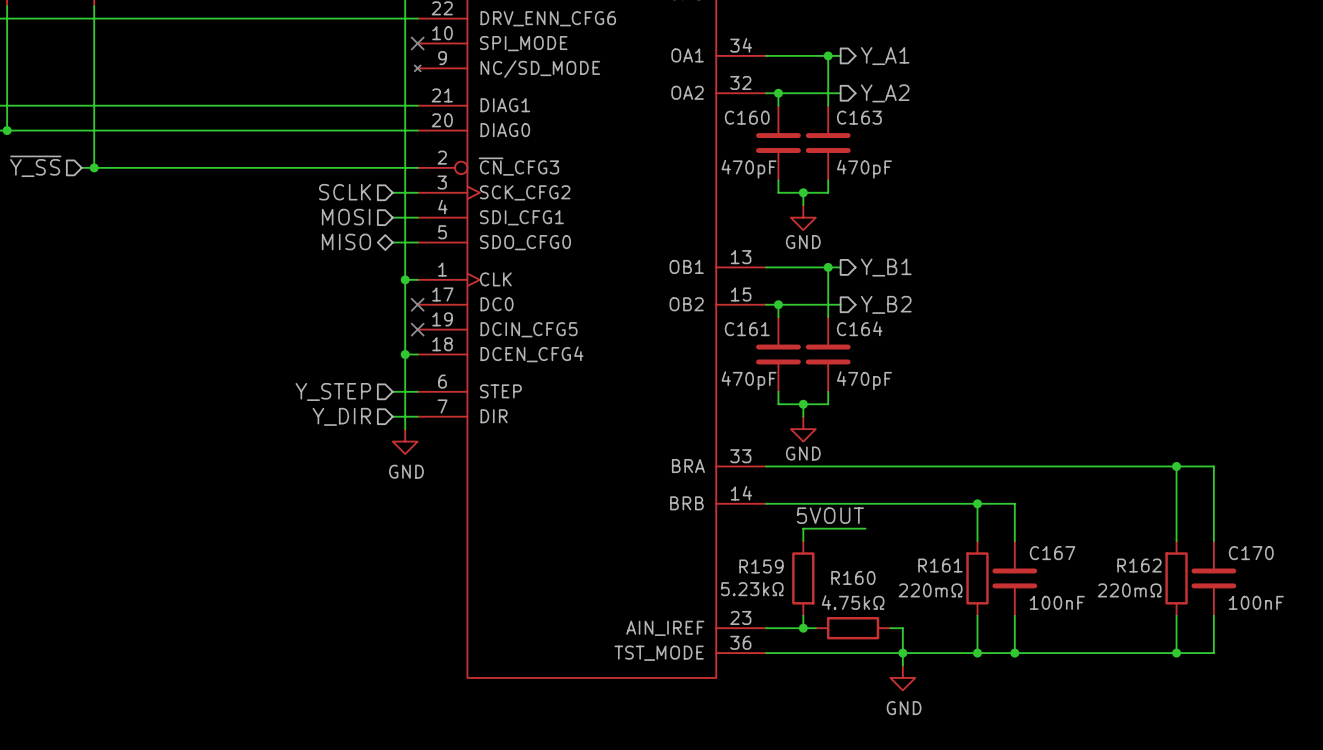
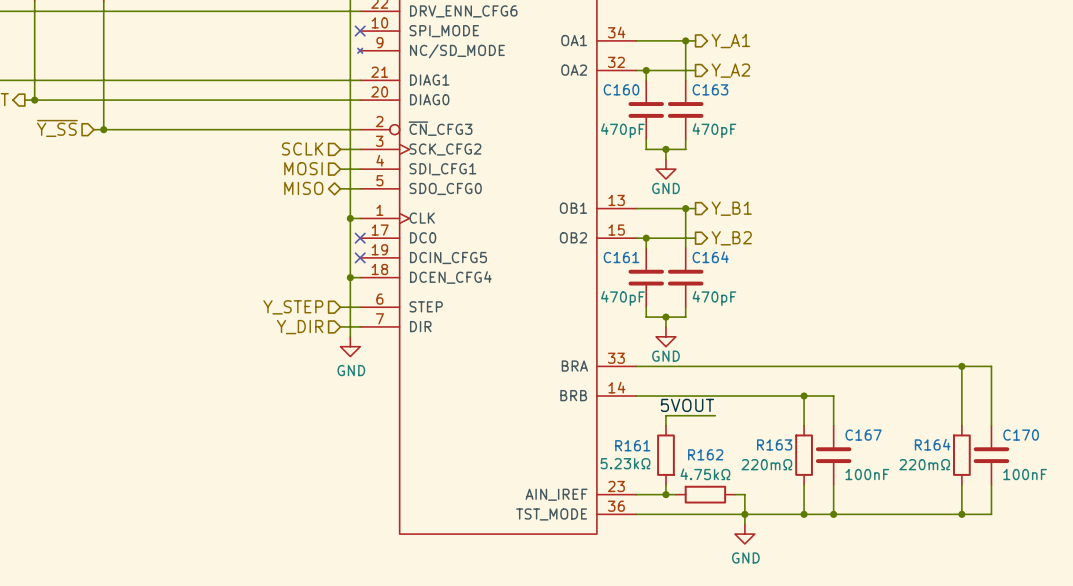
R161 name: R161 (940, 565) -> R163 (774, 444)
R162 name: R162 (1139, 565) -> R164 (932, 444)
R159 name: R159 (761, 566) -> R161 (632, 445)
R160 name: R160 (853, 577) -> R162 (705, 454)

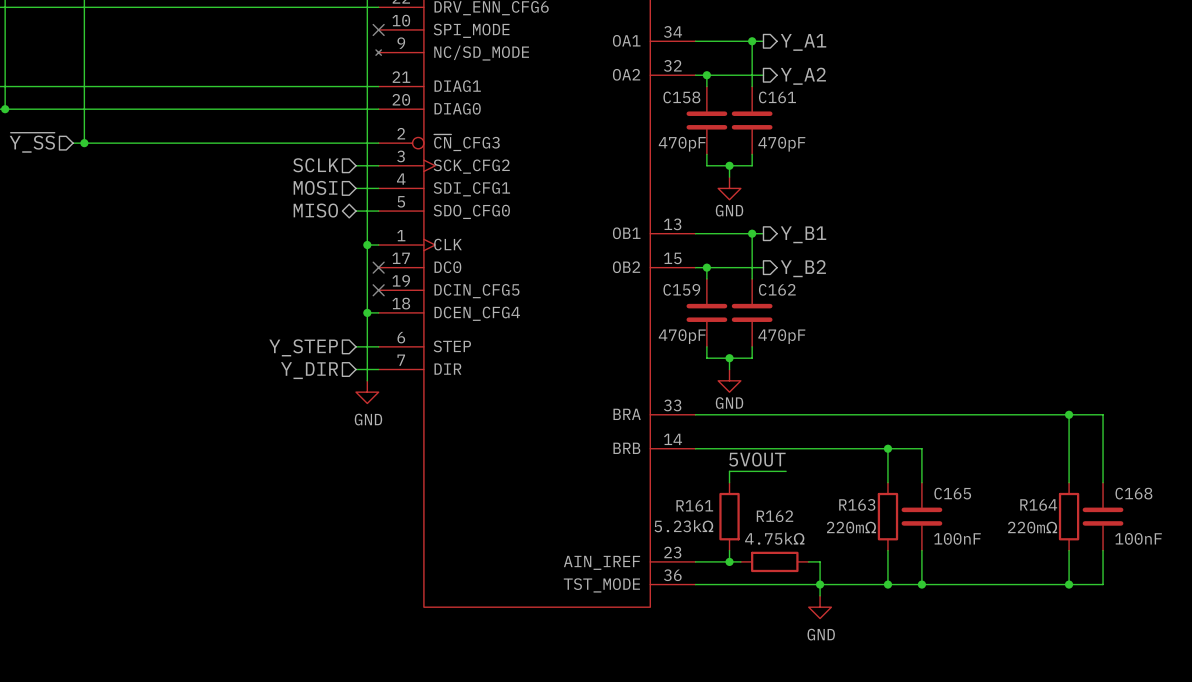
C160 name: C160 (621, 89) -> C158 (681, 97)
C163 name: C163 (710, 89) -> C161 (777, 97)
C161 name: C161 (621, 257) -> C159 (681, 289)
C164 name: C164 (710, 257) -> C162 (777, 289)
C167 name: C167 (863, 435) -> C165 (952, 493)
C170 name: C170 (1021, 435) -> C168 (1133, 493)

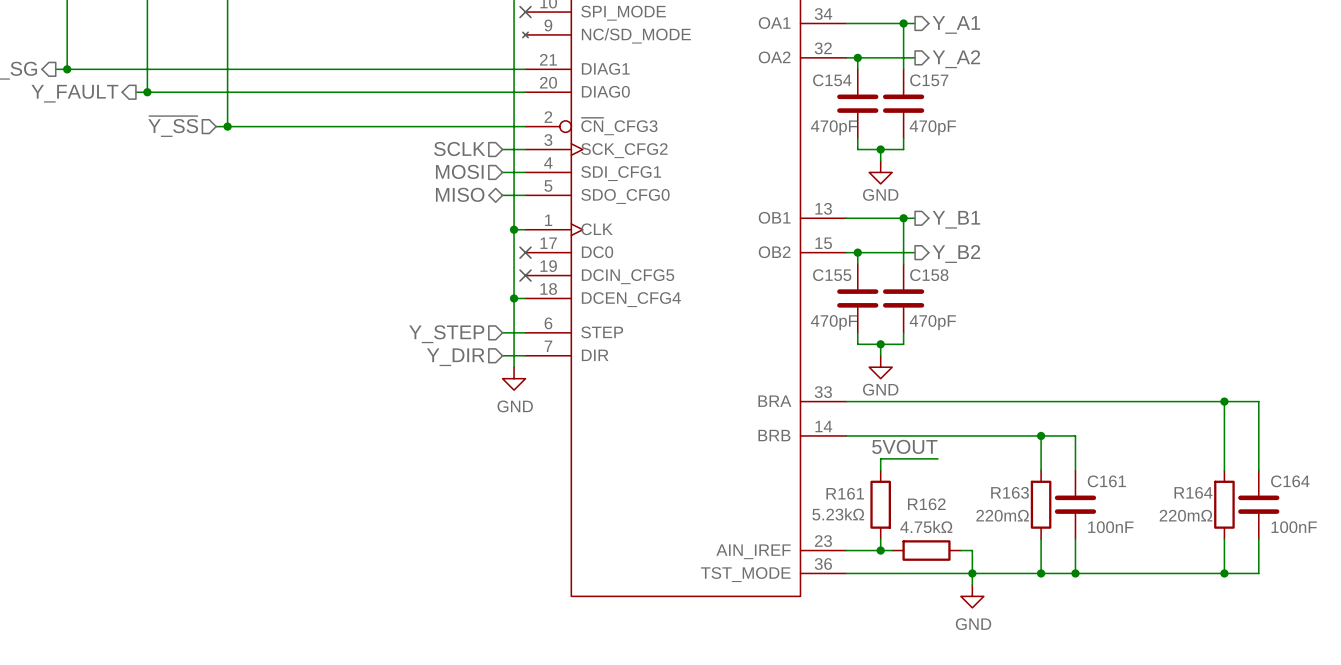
C158 name: C158 (681, 97) -> C154 (832, 80)
C161 name: C161 (777, 97) -> C157 (929, 80)
C159 name: C159 (681, 289) -> C155 (832, 275)
C162 name: C162 (777, 289) -> C158 (929, 275)
C165 name: C165 (952, 493) -> C161 (1106, 481)
C168 name: C168 (1133, 493) -> C164 (1290, 481)

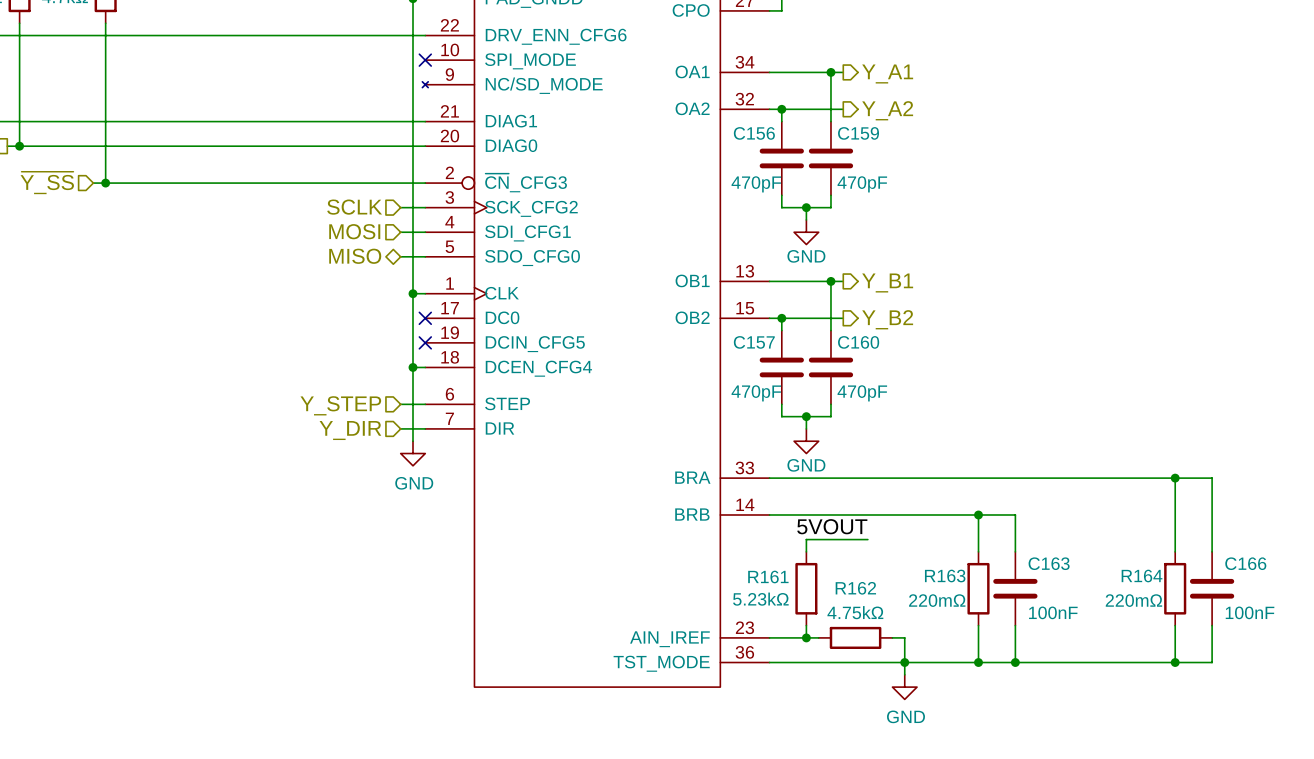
C154 name: C154 (832, 80) -> C156 (754, 133)
C157 name: C157 (929, 80) -> C159 (858, 133)
C155 name: C155 (832, 275) -> C157 (754, 342)
C158 name: C158 (929, 275) -> C160 (858, 342)
C161 name: C161 (1106, 481) -> C163 (1049, 563)
C164 name: C164 (1290, 481) -> C166 (1245, 563)

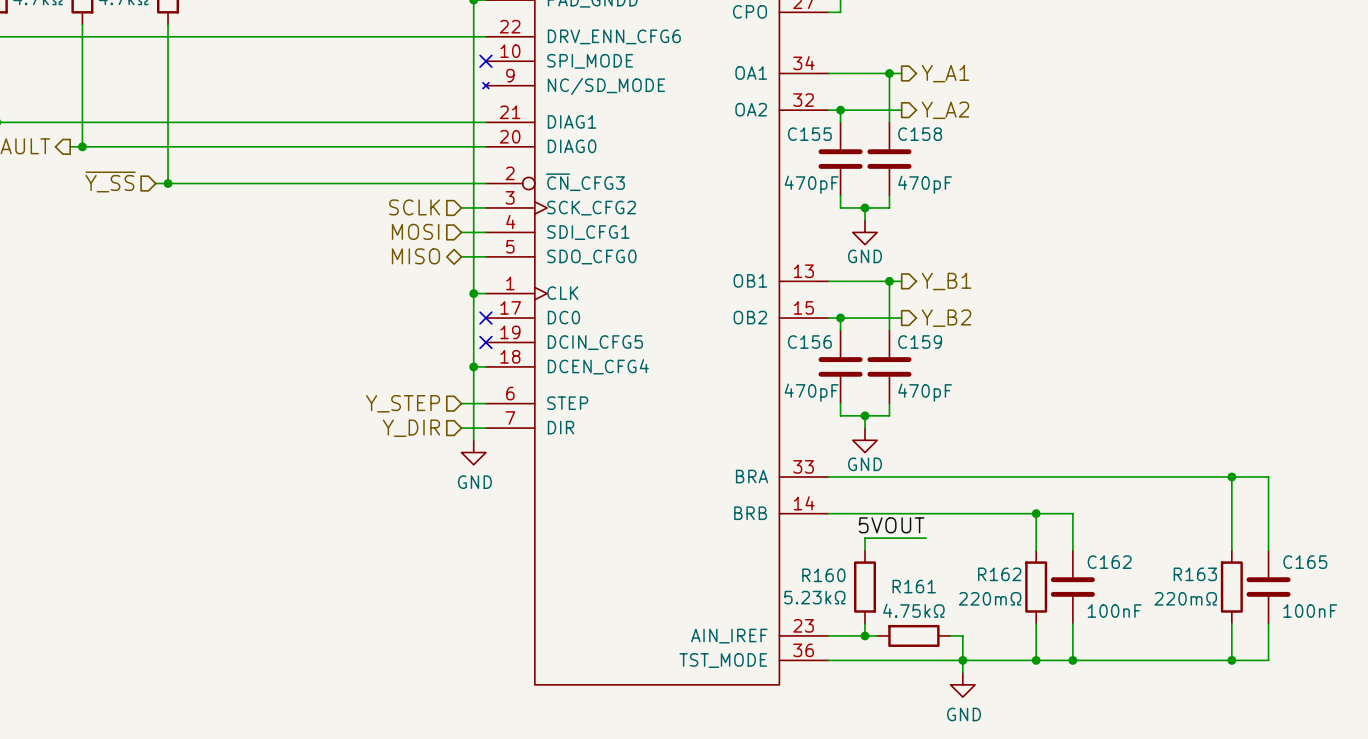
C156 name: C156 (754, 133) -> C155 (809, 134)
C159 name: C159 (858, 133) -> C158 (920, 134)
C157 name: C157 (754, 342) -> C156 (809, 342)
C160 name: C160 (858, 342) -> C159 (920, 342)
C163 name: C163 (1049, 563) -> C162 (1109, 562)
C166 name: C166 (1245, 563) -> C165 (1305, 562)
R161 name: R161 (768, 576) -> R160 (823, 575)
R163 name: R163 (945, 576) -> R162 (999, 574)
R164 name: R164 (1142, 576) -> R163 (1195, 574)
R162 name: R162 (855, 588) -> R161 (914, 586)

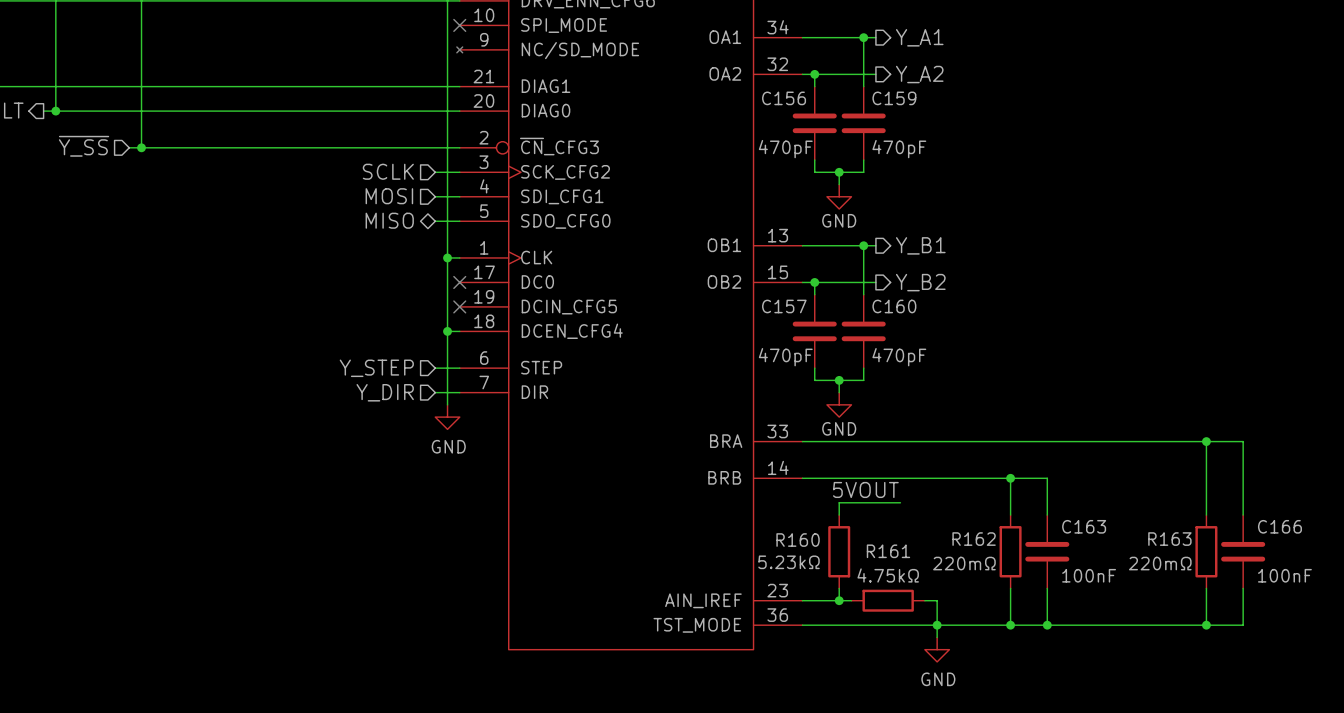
C155 name: C155 (809, 134) -> C156 (784, 98)
C158 name: C158 (920, 134) -> C159 (894, 98)
C156 name: C156 (809, 342) -> C157 (784, 306)
C159 name: C159 (920, 342) -> C160 (894, 306)
C162 name: C162 (1109, 562) -> C163 (1084, 526)
C165 name: C165 (1305, 562) -> C166 (1279, 526)

